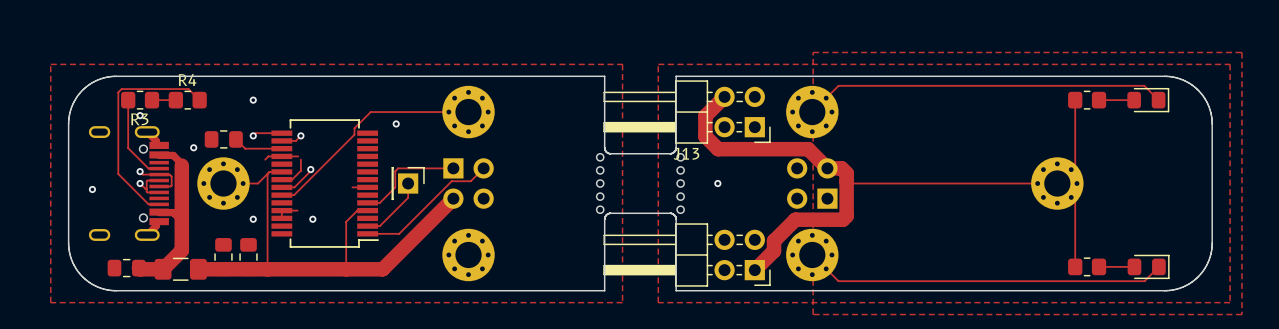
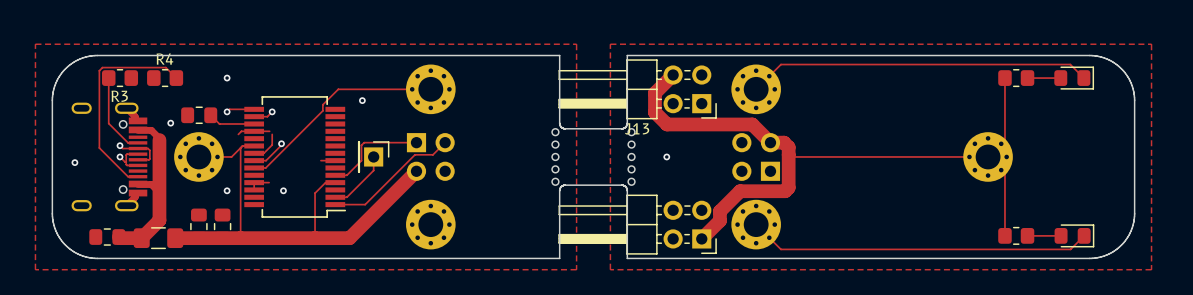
zone outline: (813, 52) (813, 314) (1241, 314) (1241, 52) (813, 52) -> none
track: (152, 100) (175, 100) -> none
via: (140, 115) -> none

